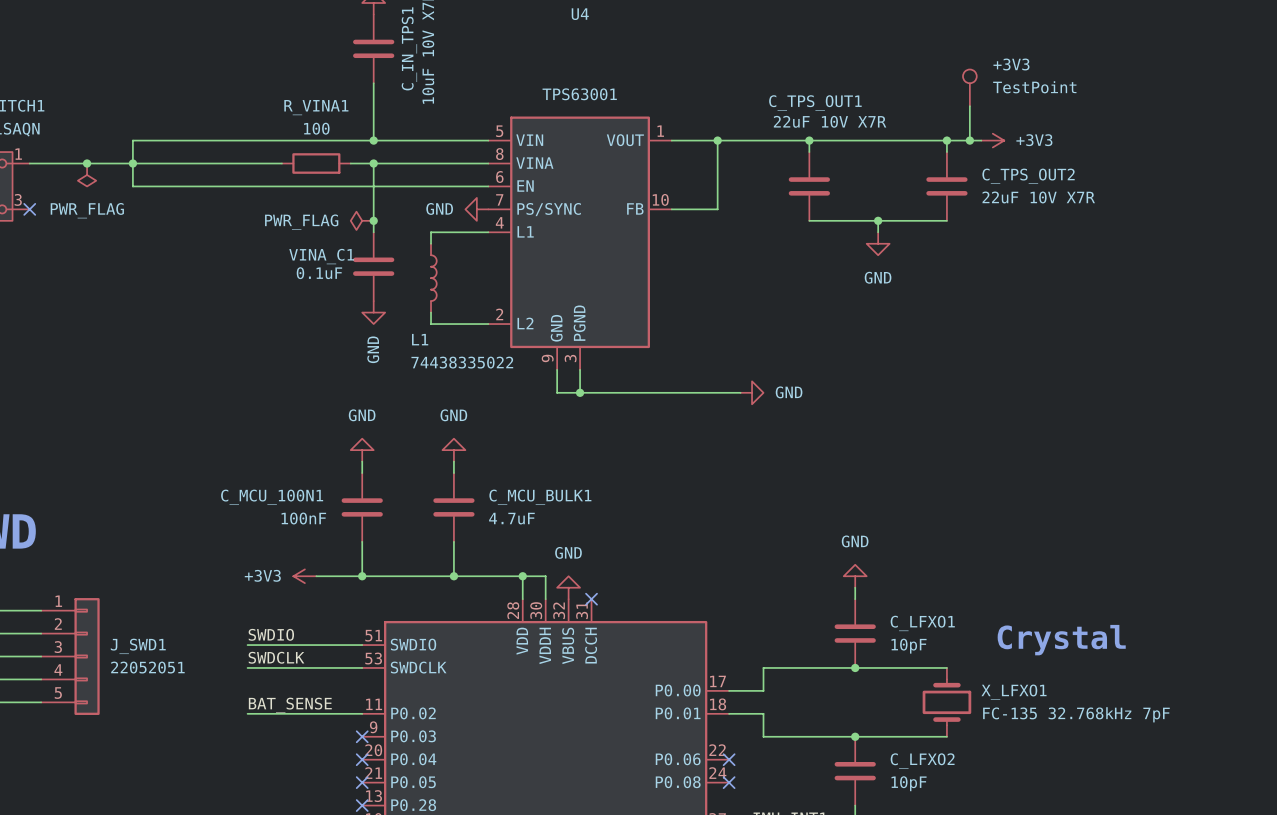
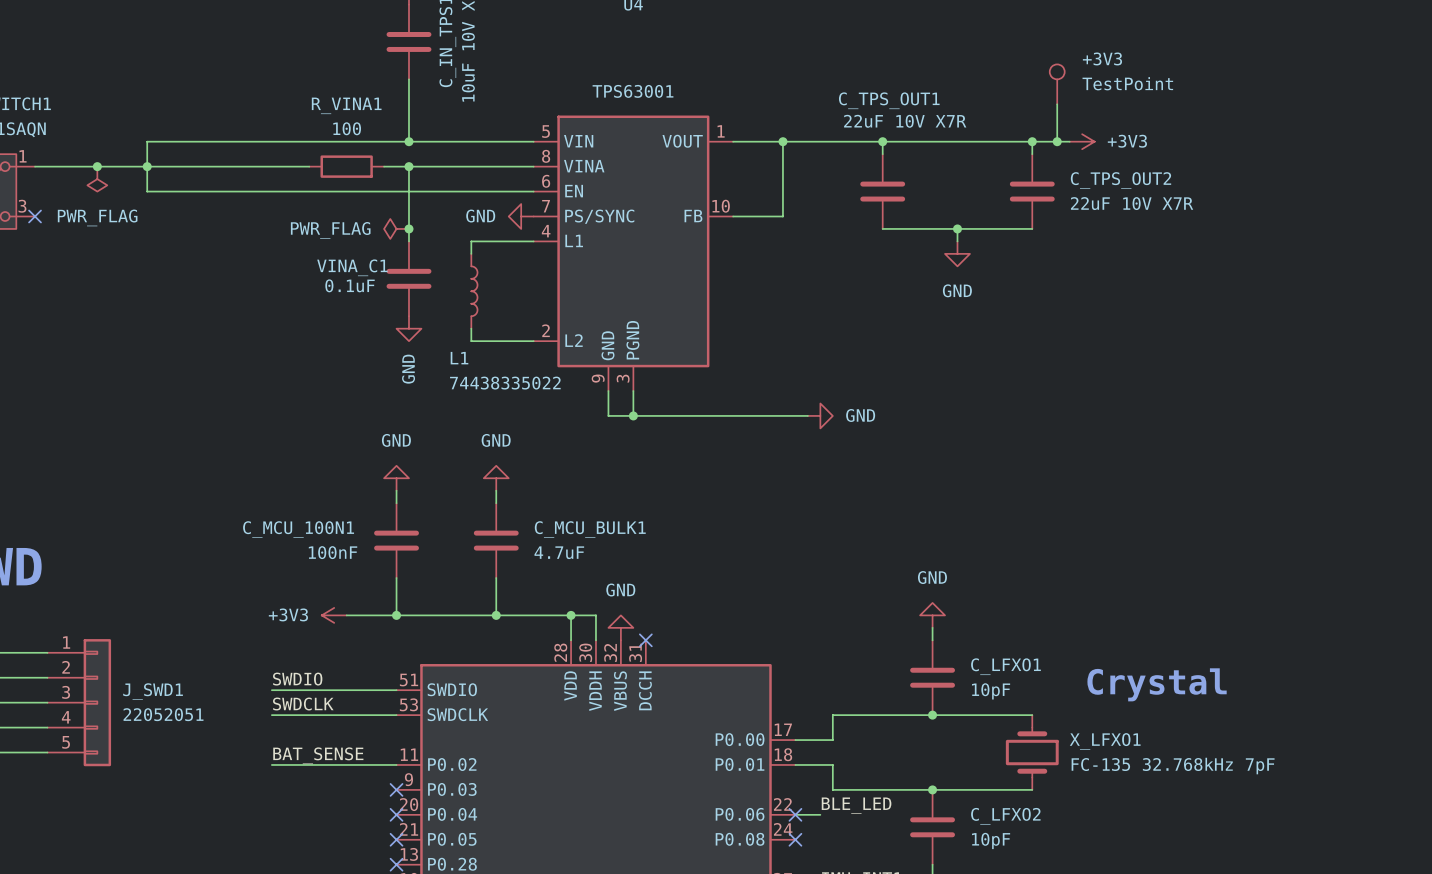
label: none -> BLE_LED (856, 805)
wire: none -> (795, 814) (820, 814)

